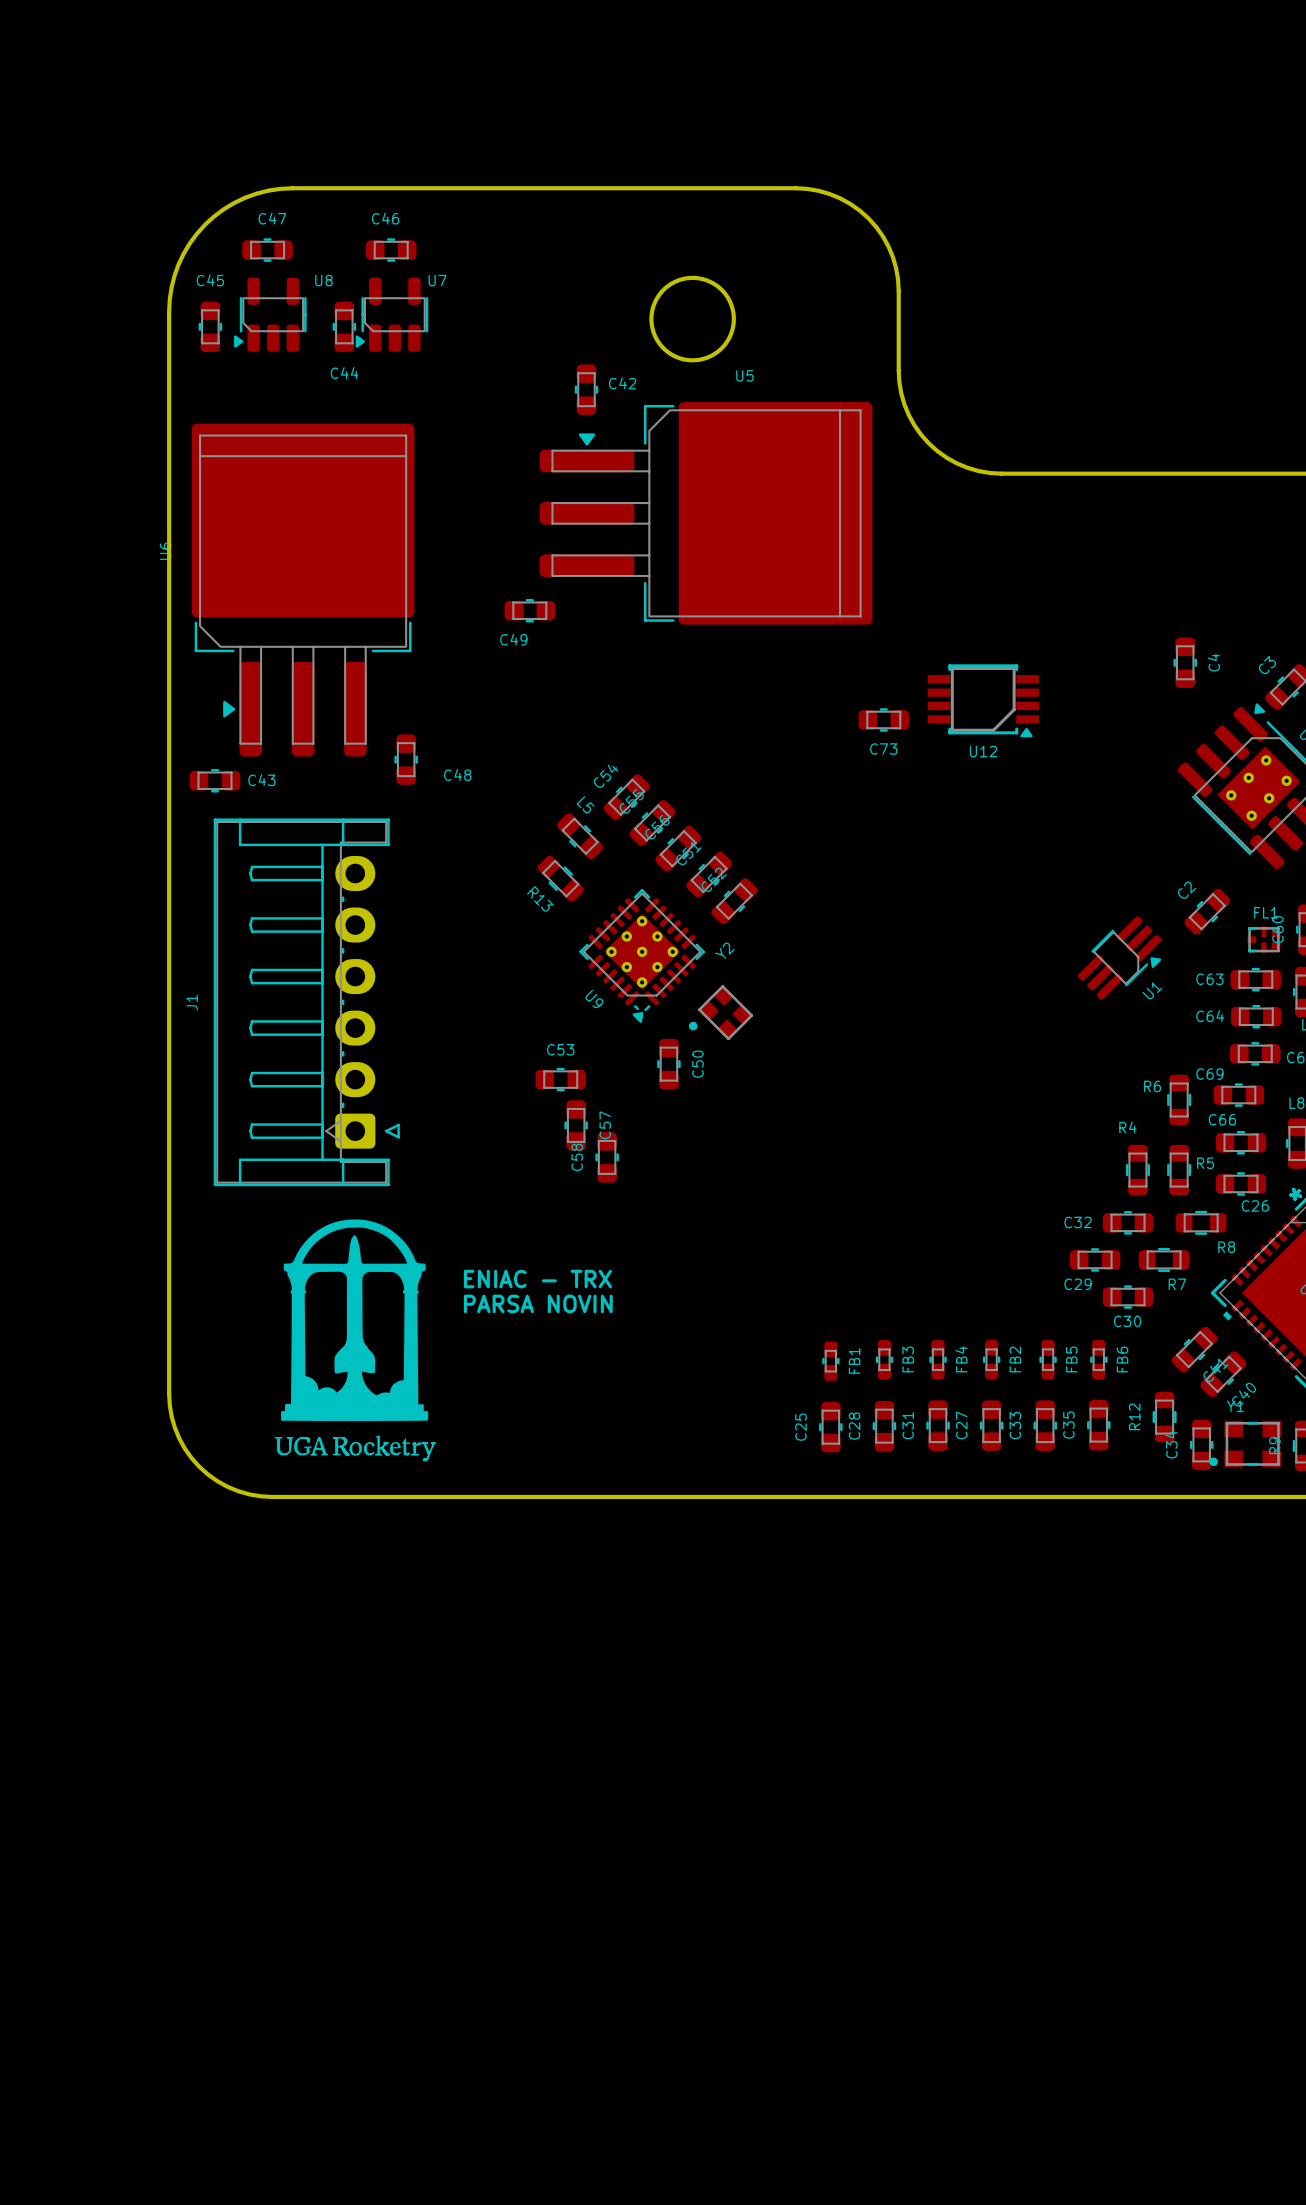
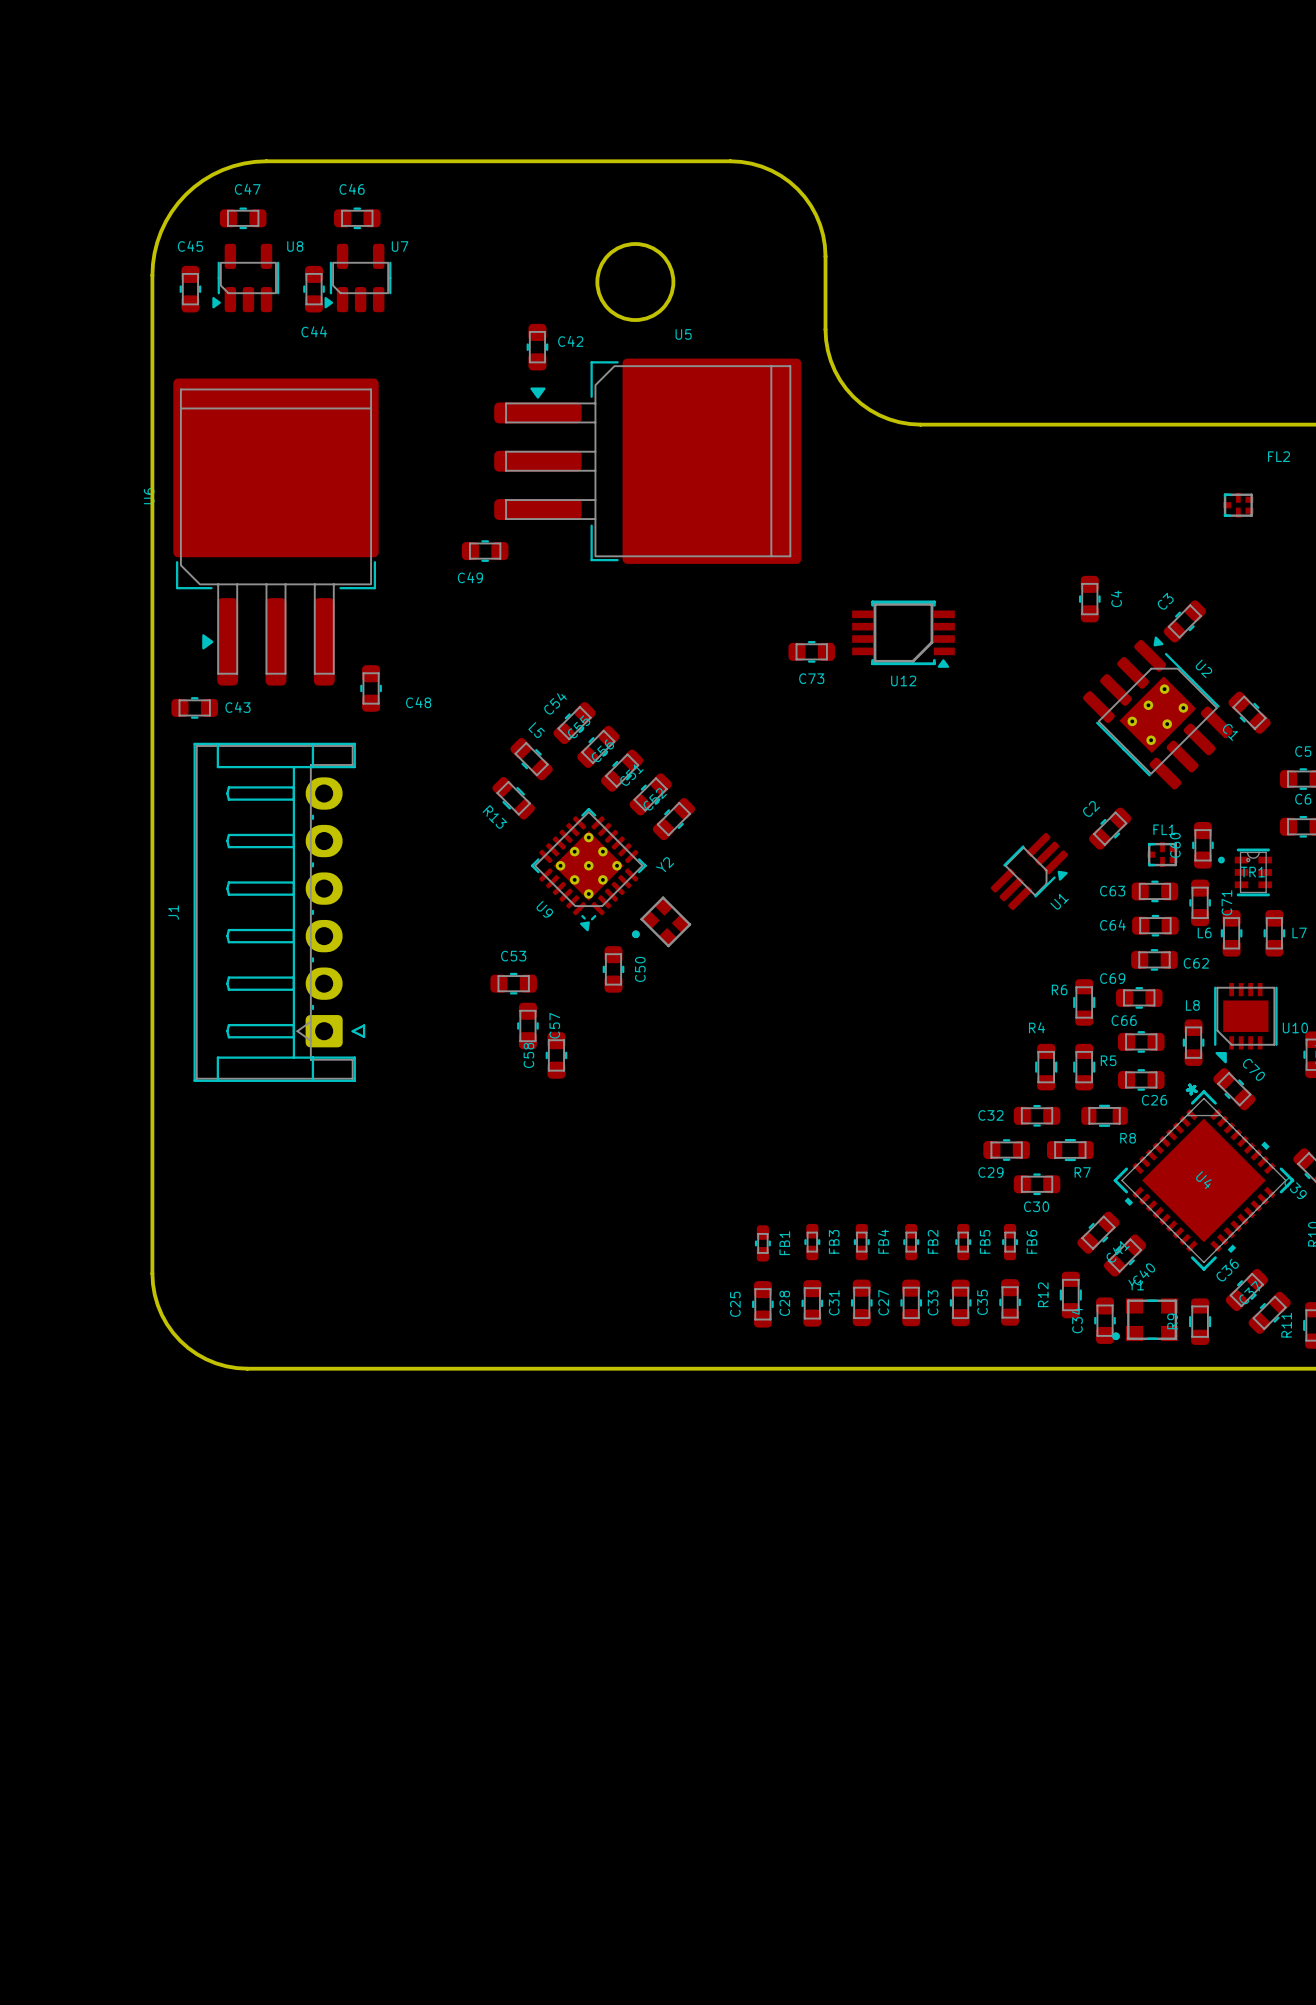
drawing: [274, 1219, 436, 1462] -> none
text: ENIAC - TRX (537, 1279) -> none
text: PARSA NOVIN (538, 1303) -> none

